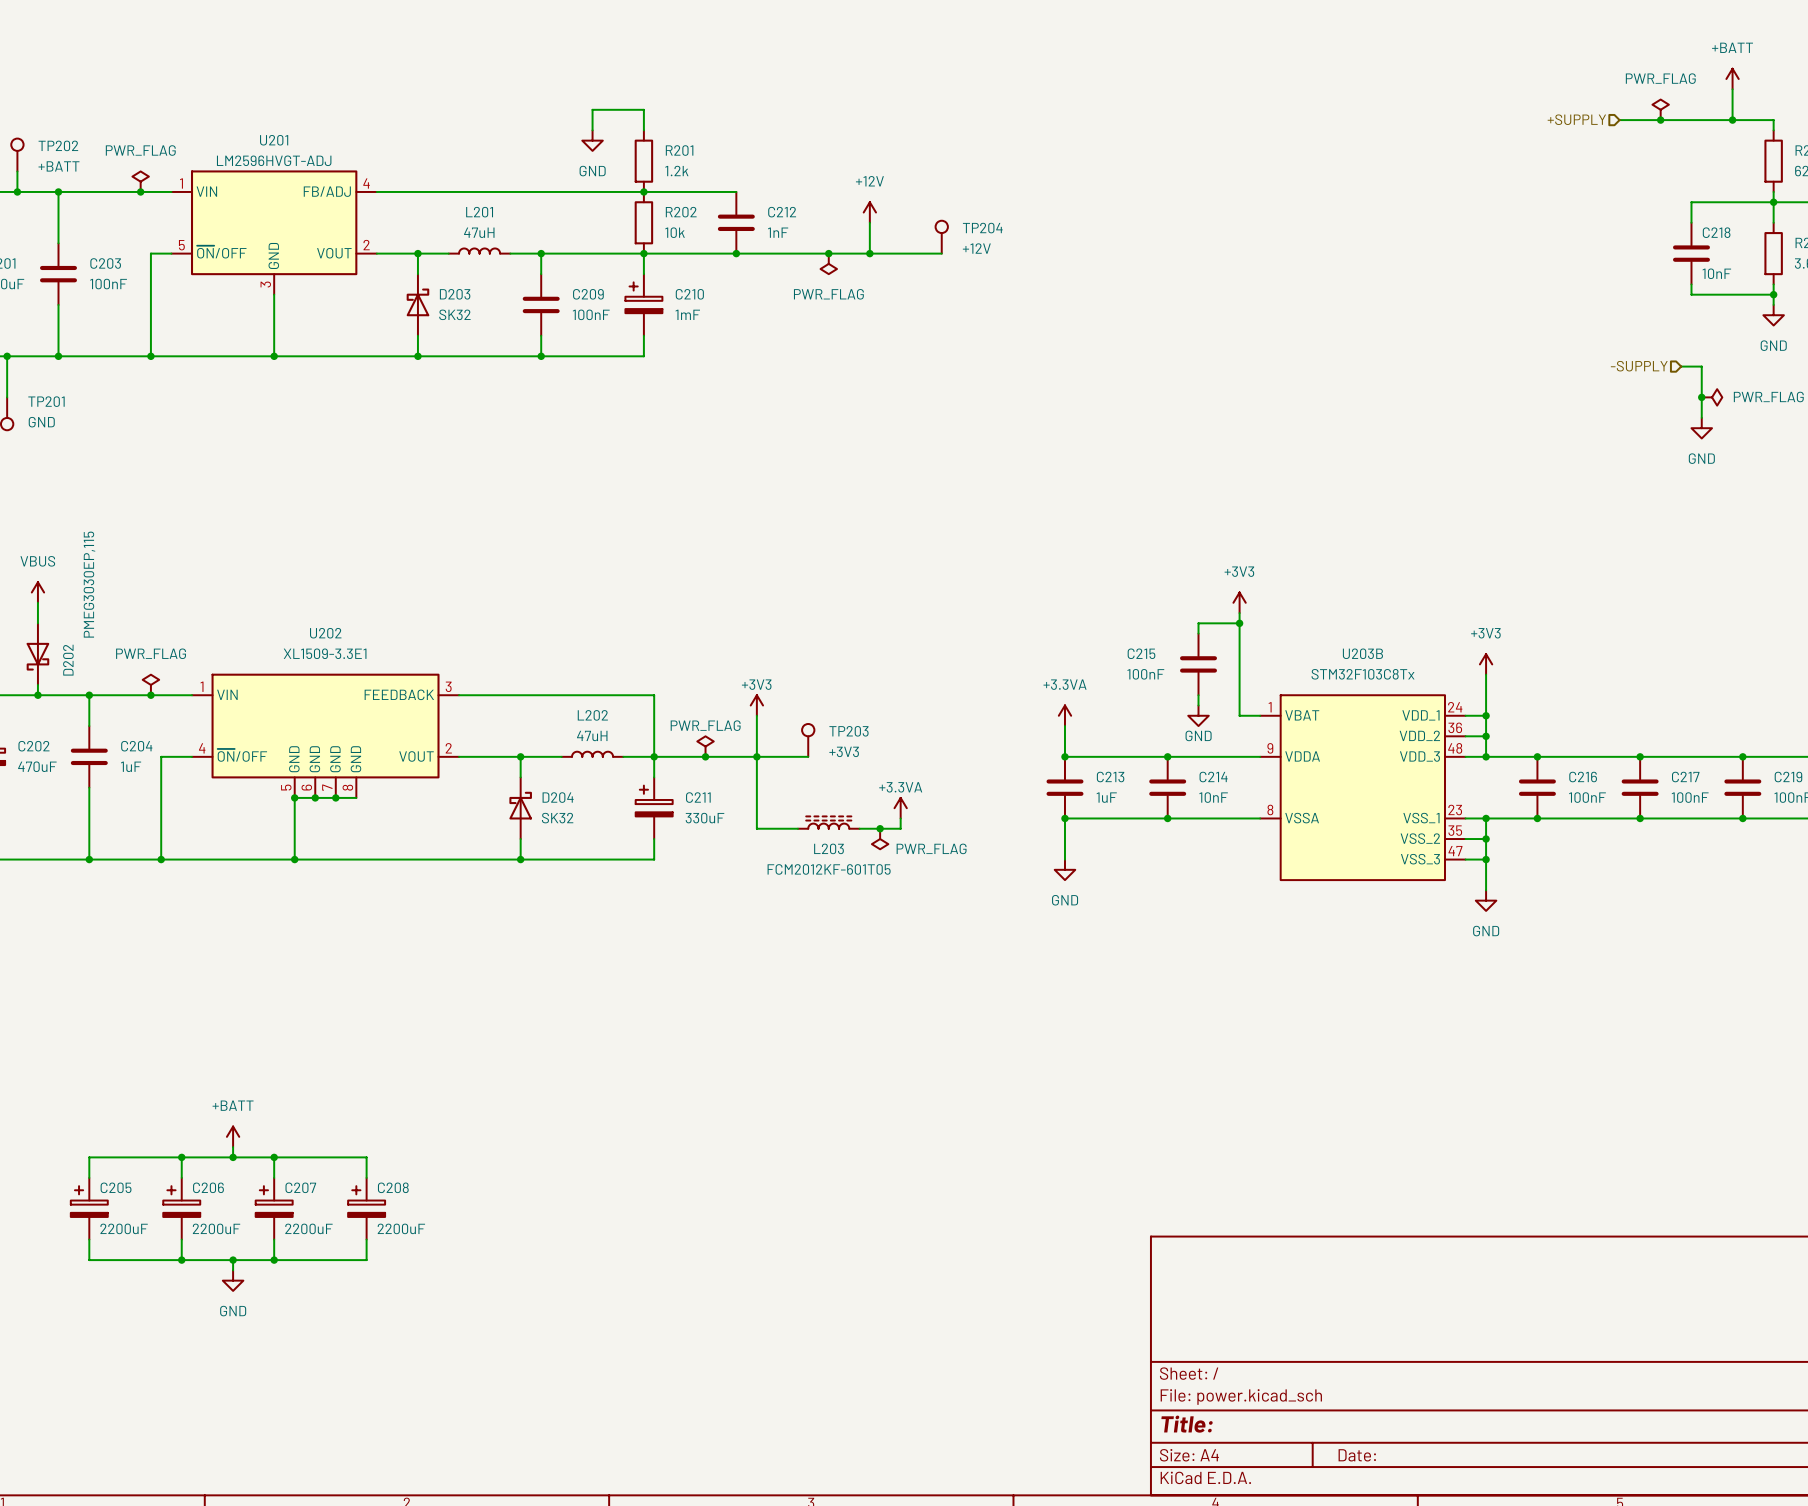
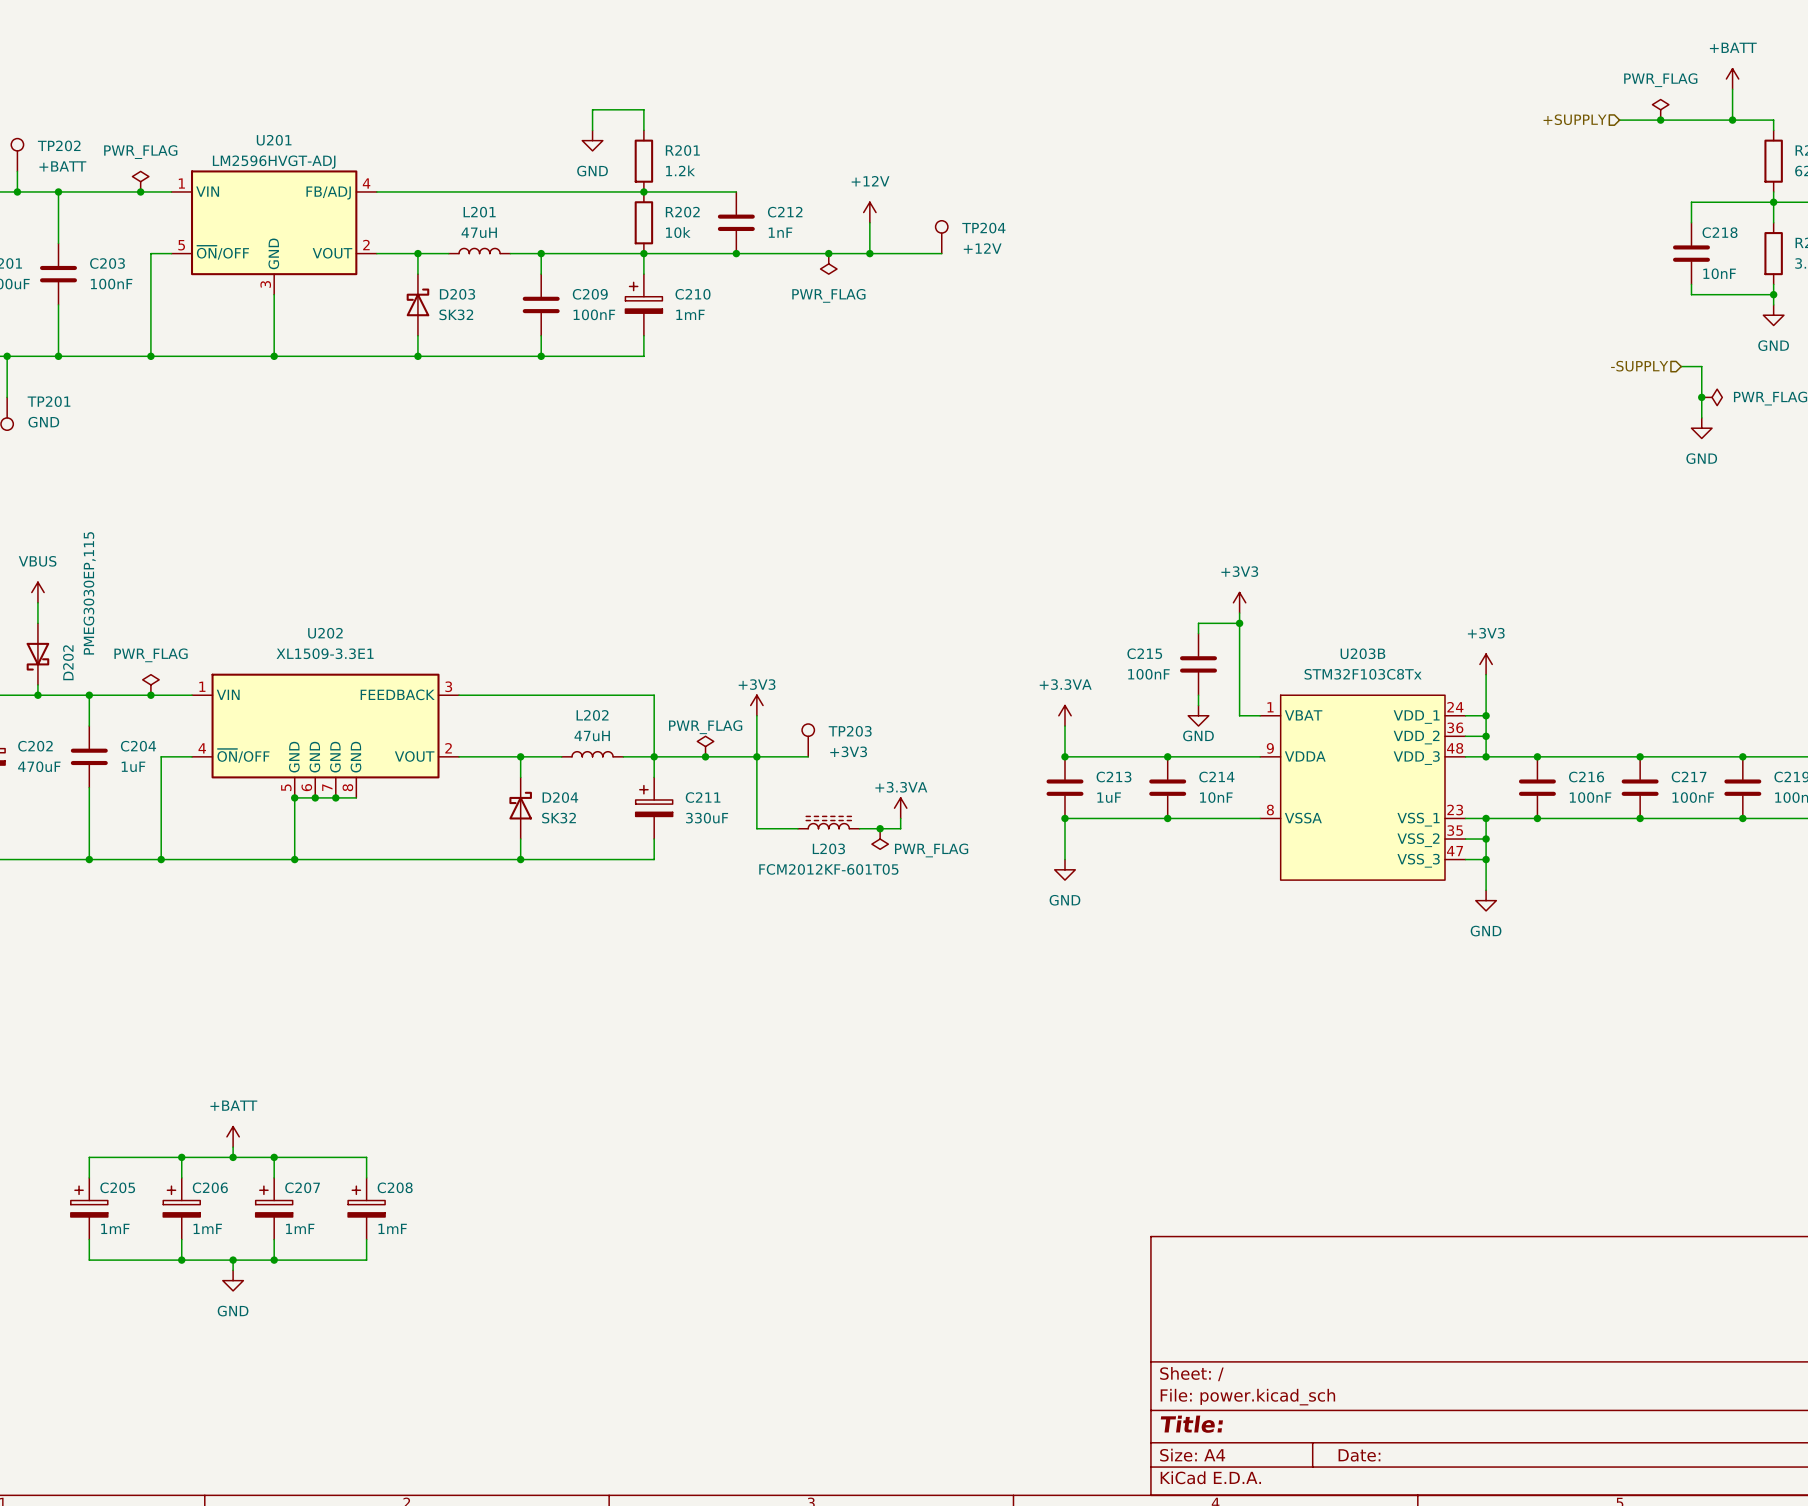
C205 value: 2200uF (124, 1228) -> 1mF (115, 1228)
C206 value: 2200uF (216, 1228) -> 1mF (207, 1228)
C207 value: 2200uF (308, 1228) -> 1mF (300, 1228)
C208 value: 2200uF (401, 1228) -> 1mF (392, 1228)

